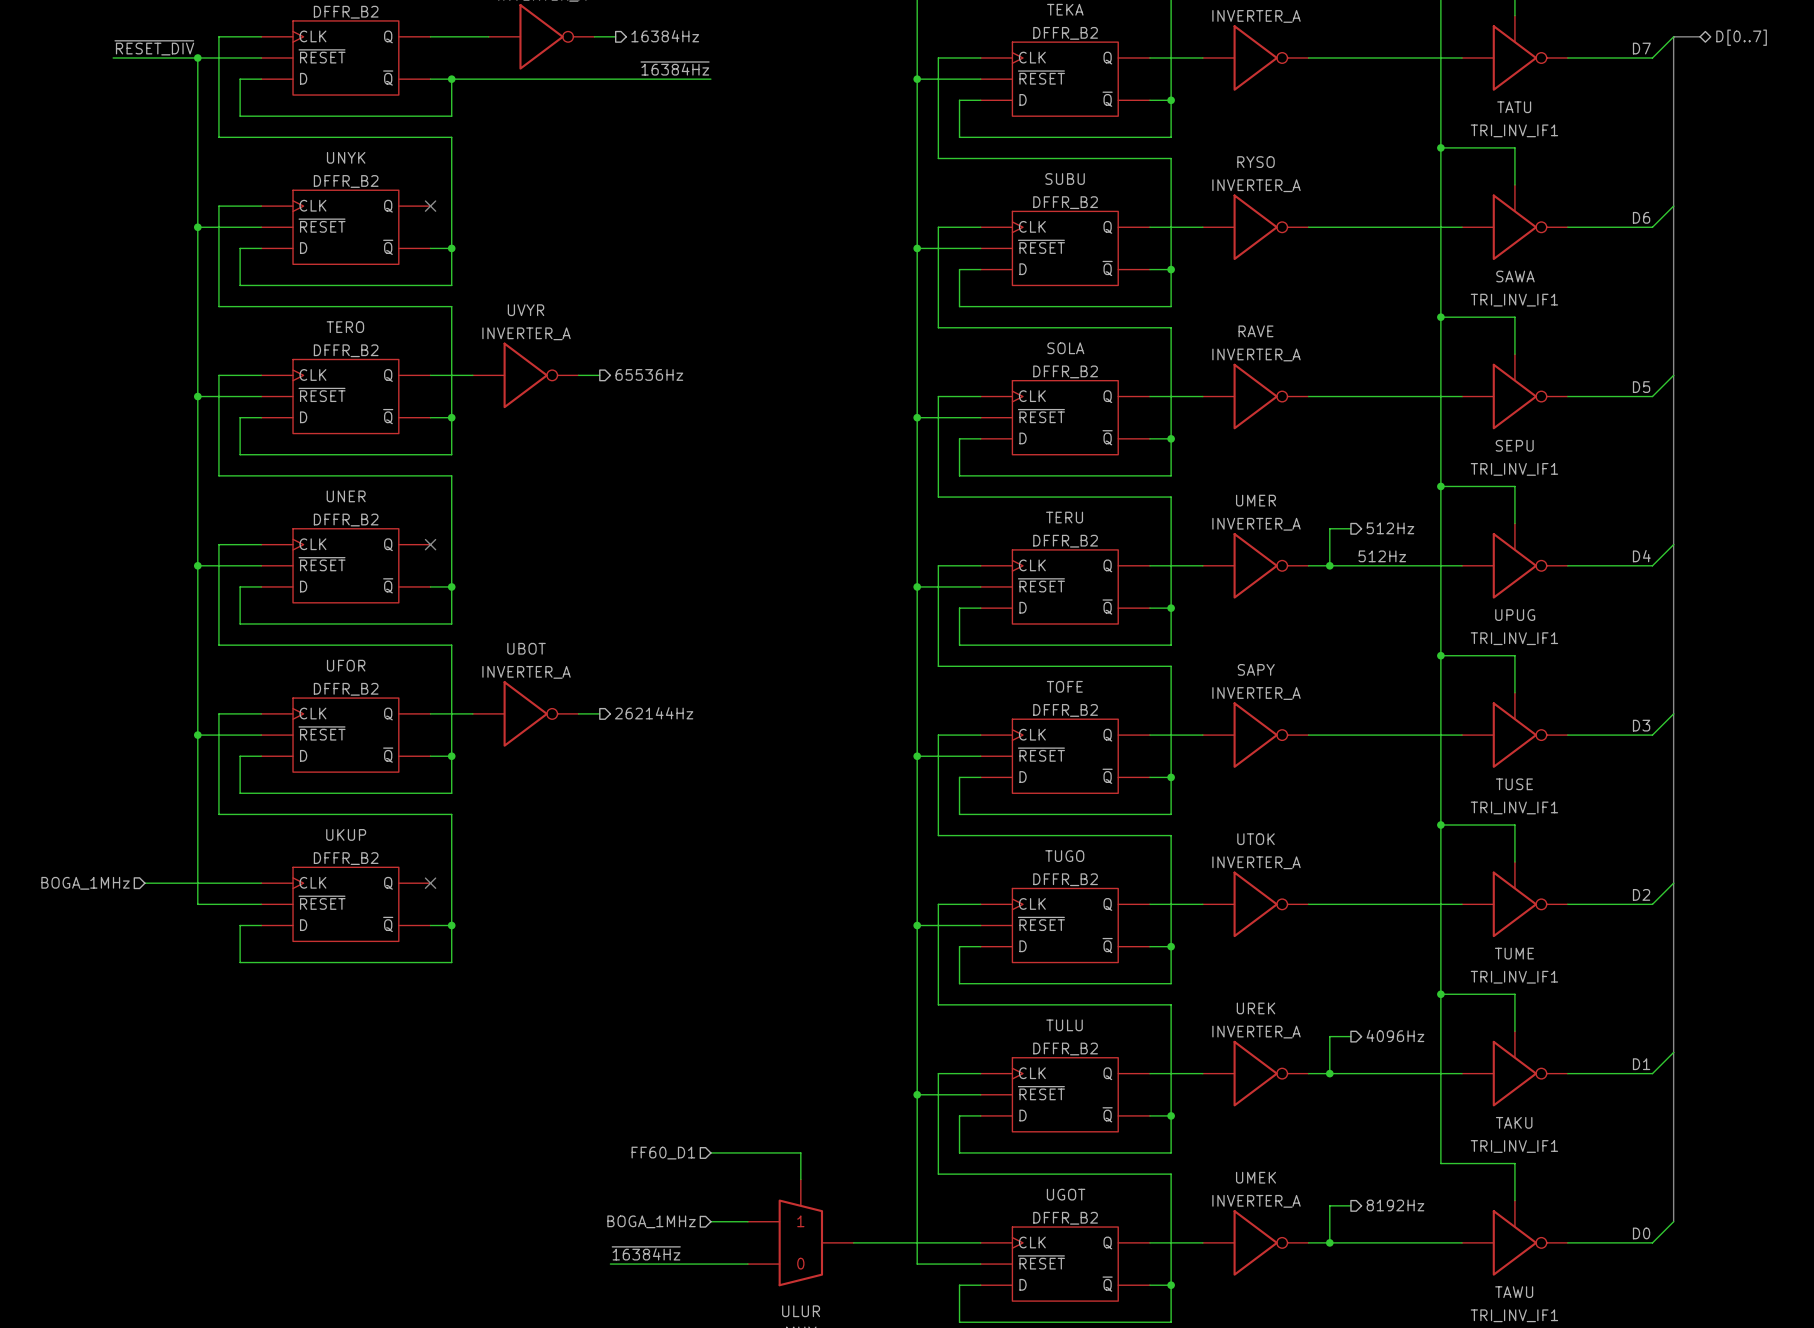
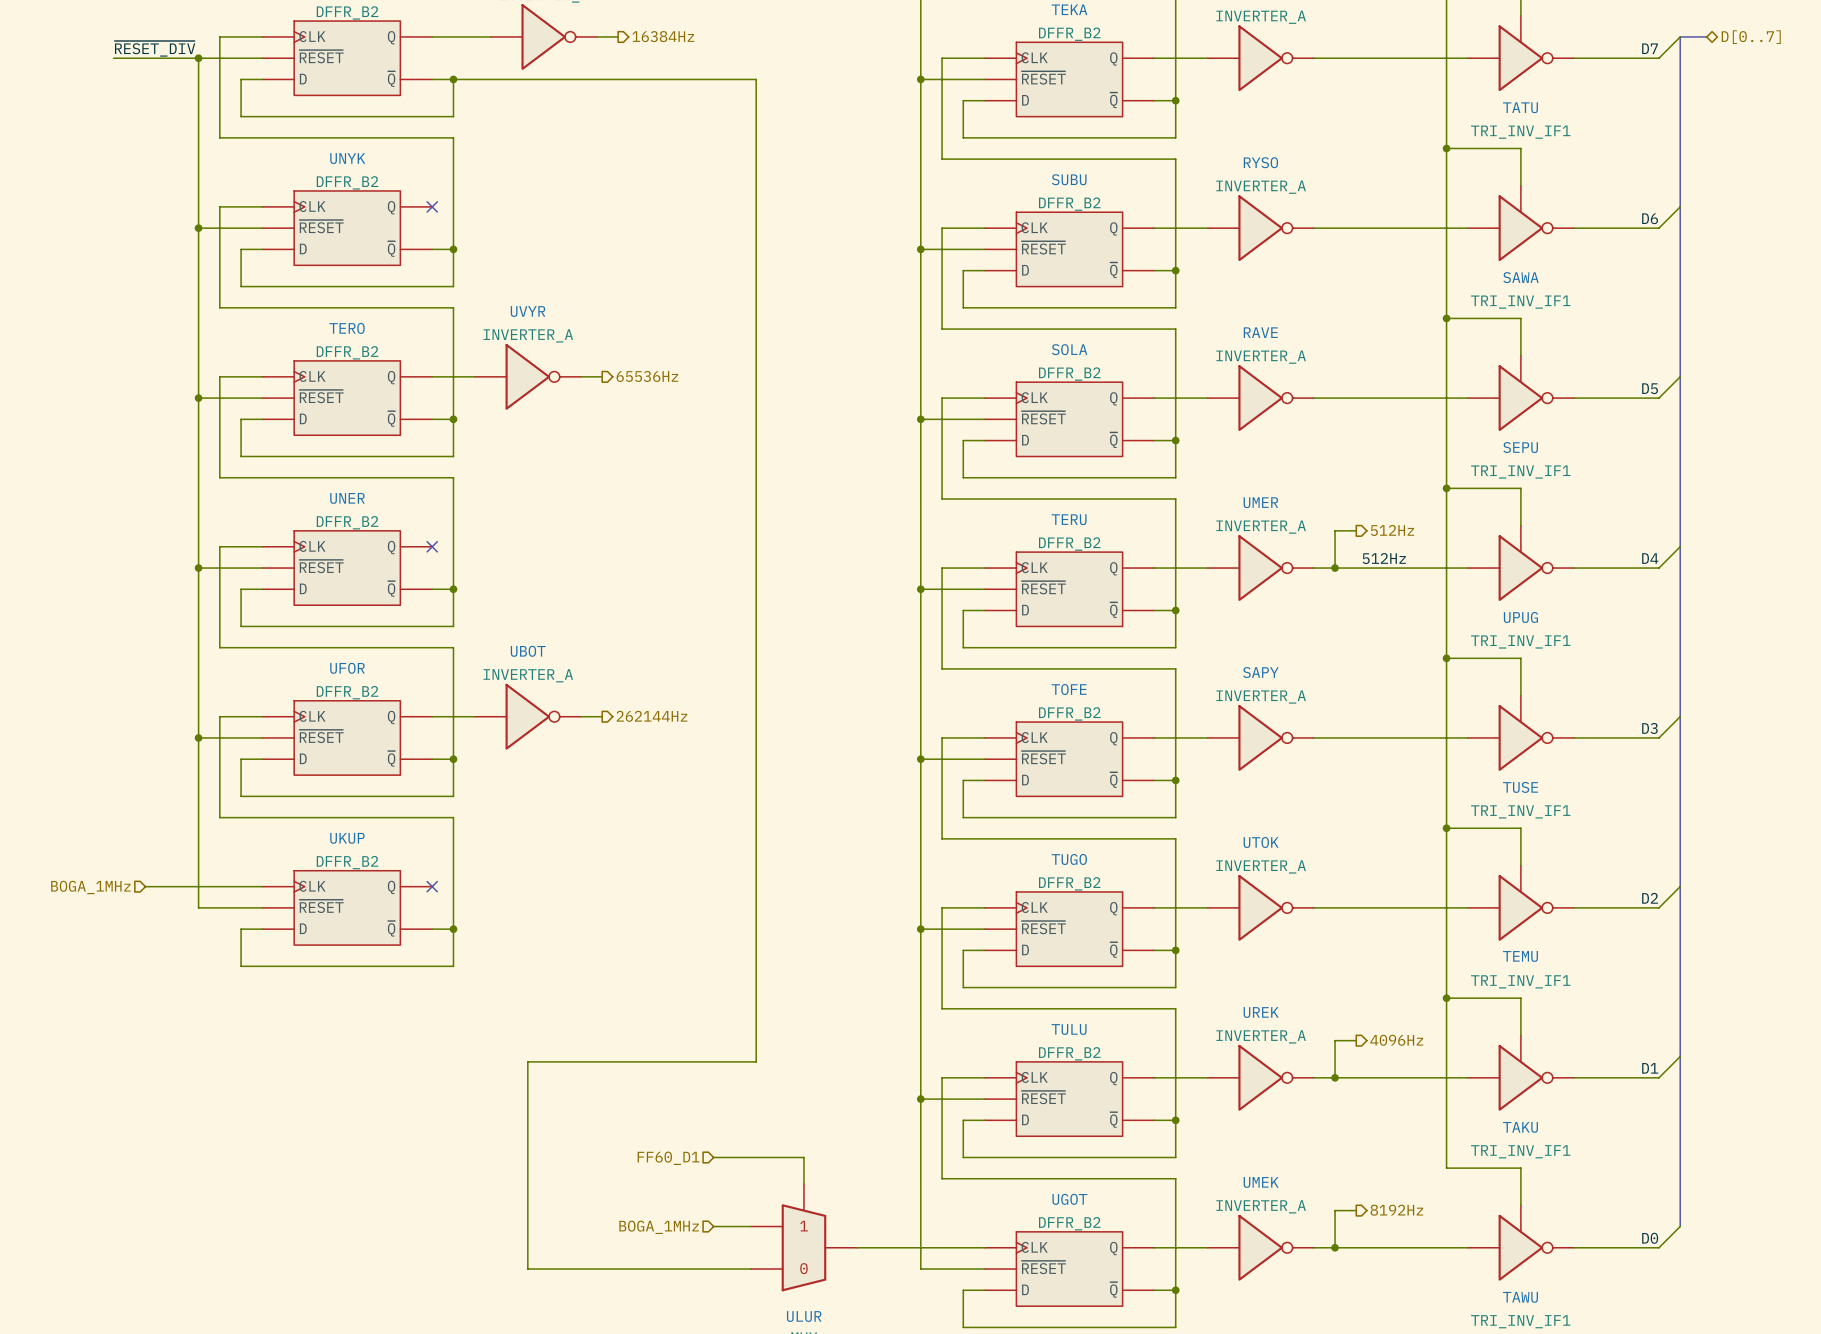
label: ~{16384Hz} (675, 68) -> none
wire: none -> (713, 79) (756, 79) (756, 1061) (527, 1061) (527, 1269) (612, 1269)
TUME name: TUME (1514, 953) -> TEMU (1520, 956)
label: ~{16384Hz} (646, 1253) -> none

